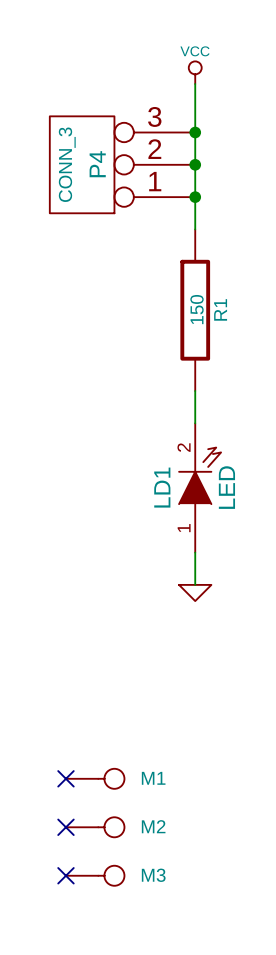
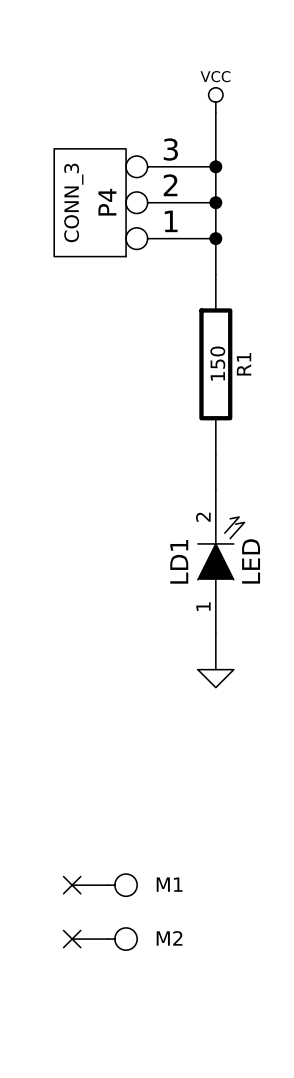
no-connect mark: (65, 875) -> none
M3: (95, 875) -> none

